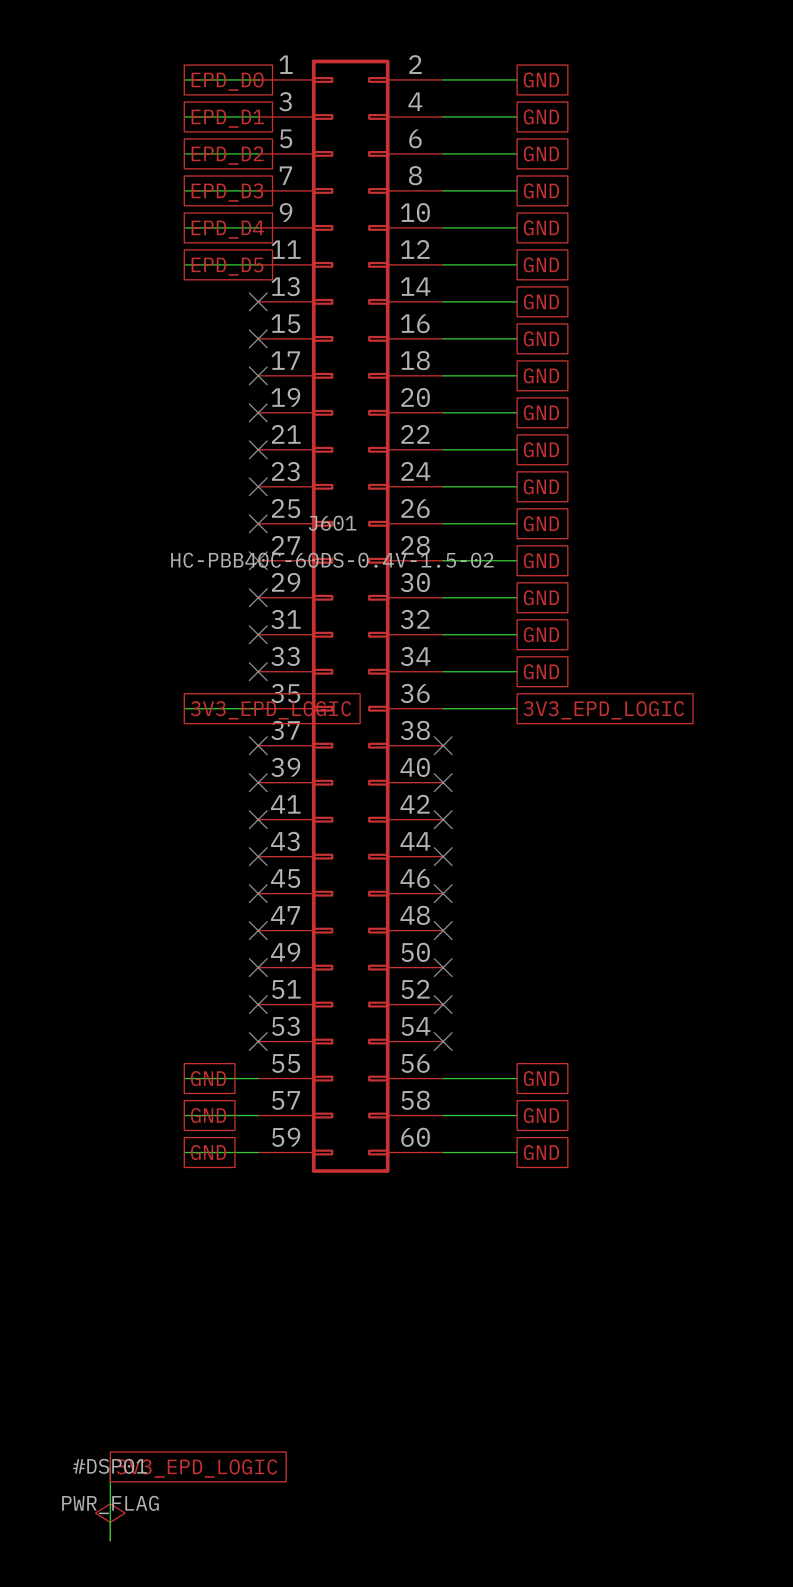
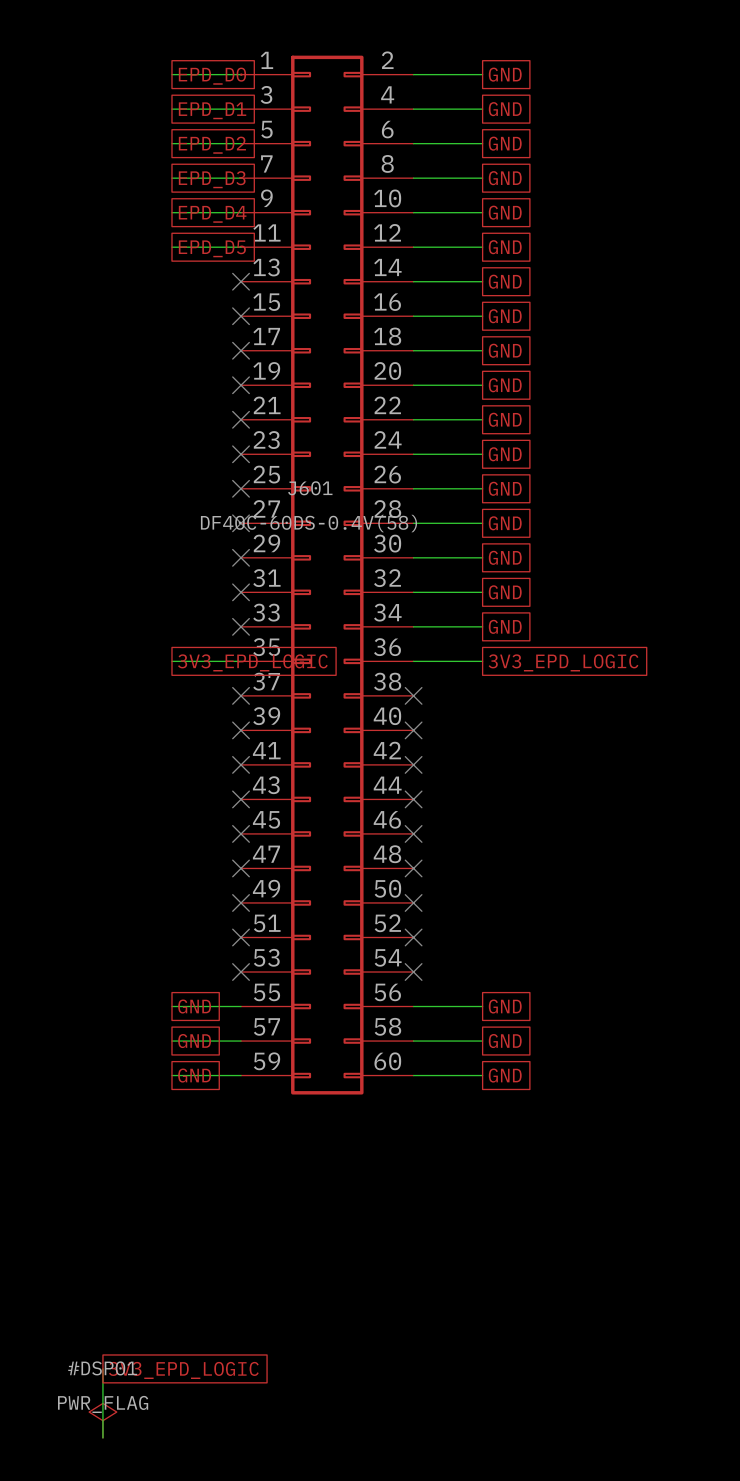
J601 value: HC-PBB40C-60DS-0.4V-1.5-02 (332, 560) -> DF40C-60DS-0.4V(58) (308, 523)

